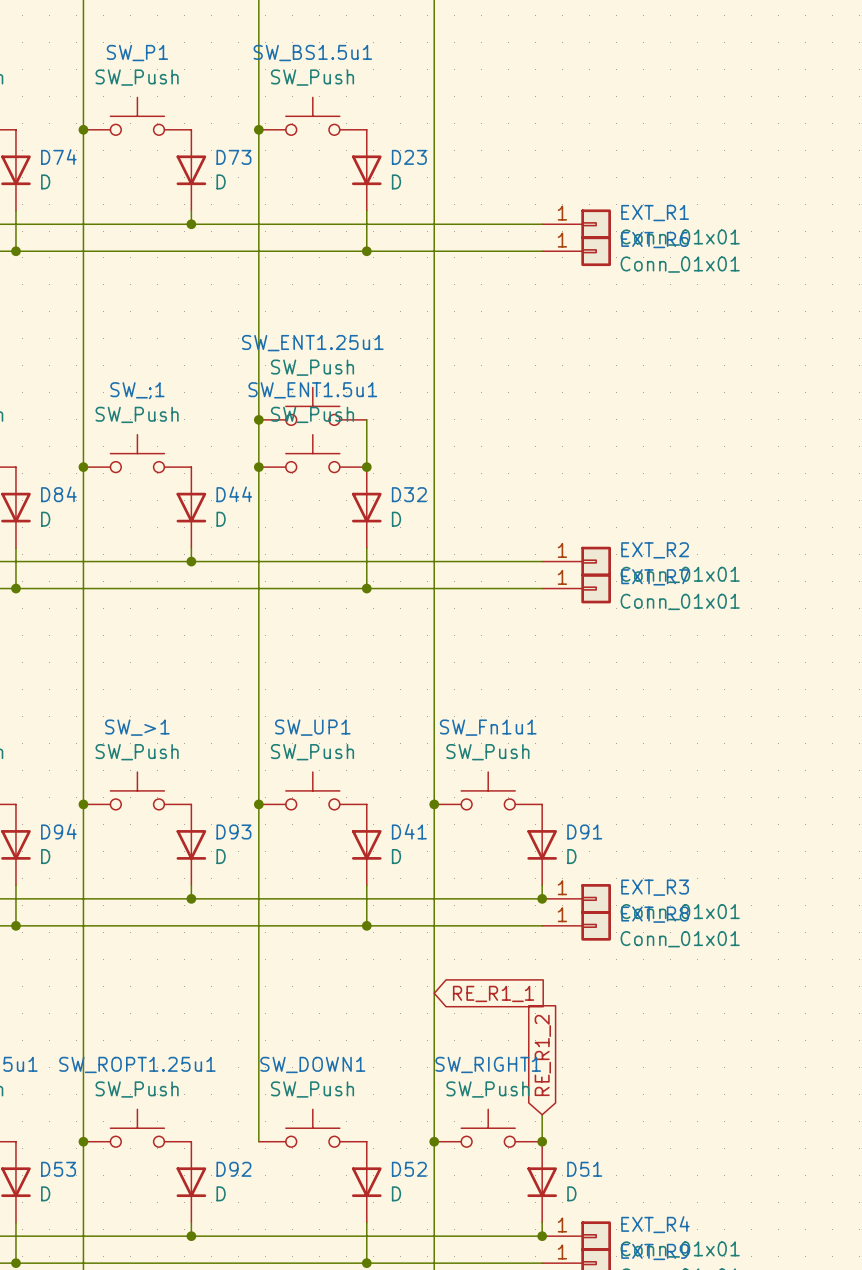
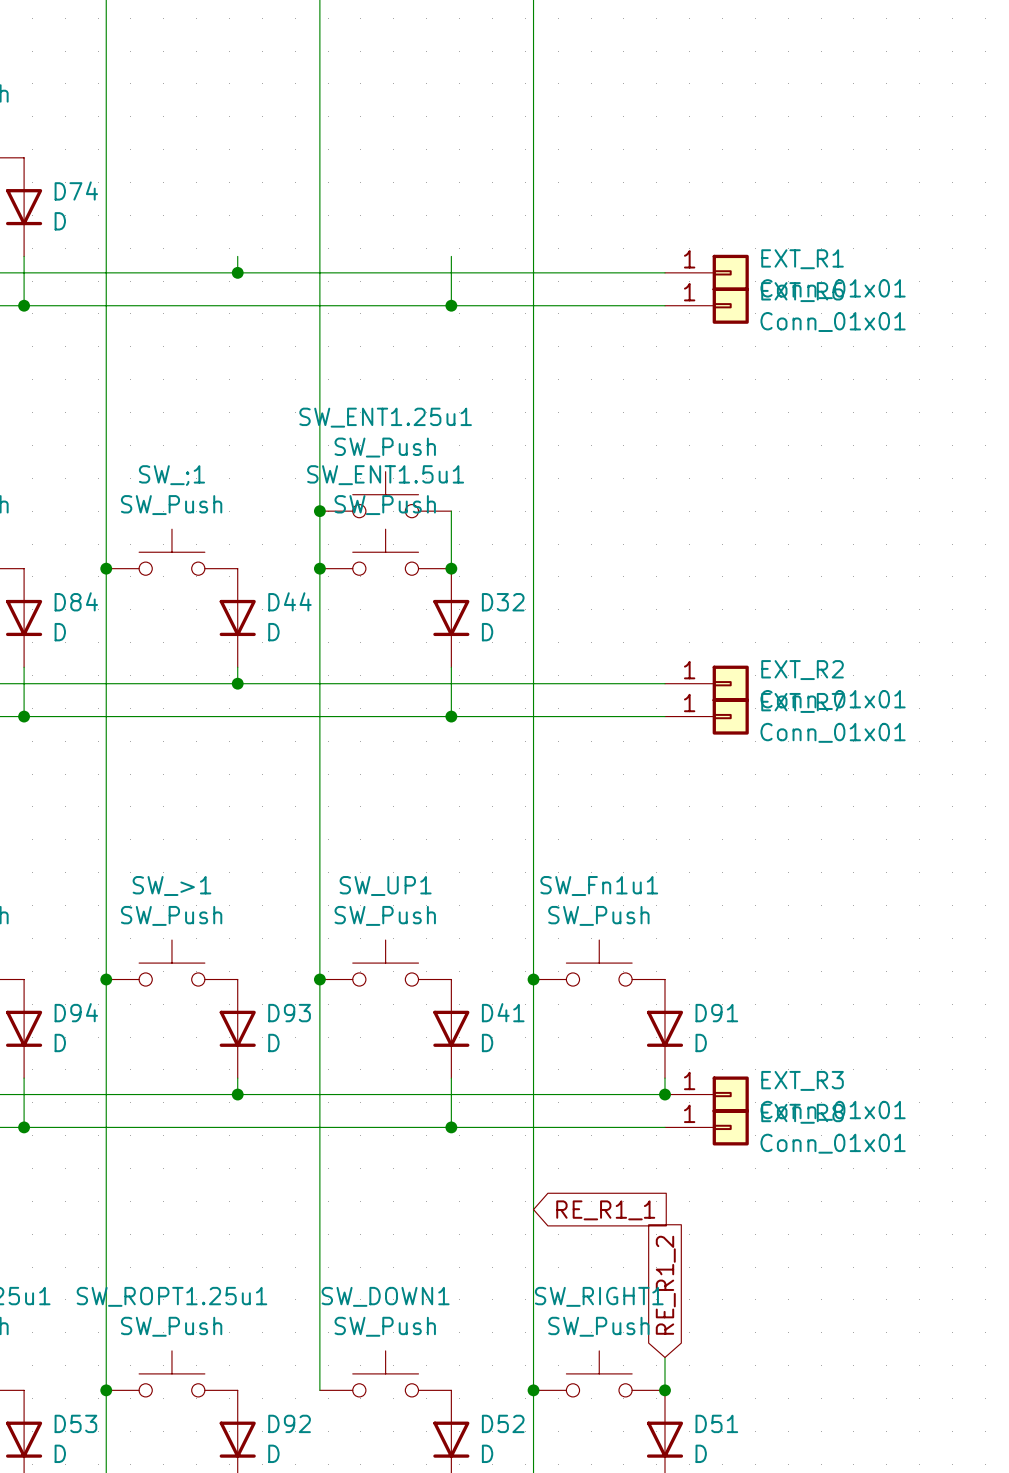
SW_P1: SW_Push (137, 116) -> none
SW_BS1.5u1: SW_Push (312, 116) -> none
junction: (83, 129) -> none
junction: (258, 129) -> none
D73: D (191, 170) -> none
D23: D (366, 170) -> none

